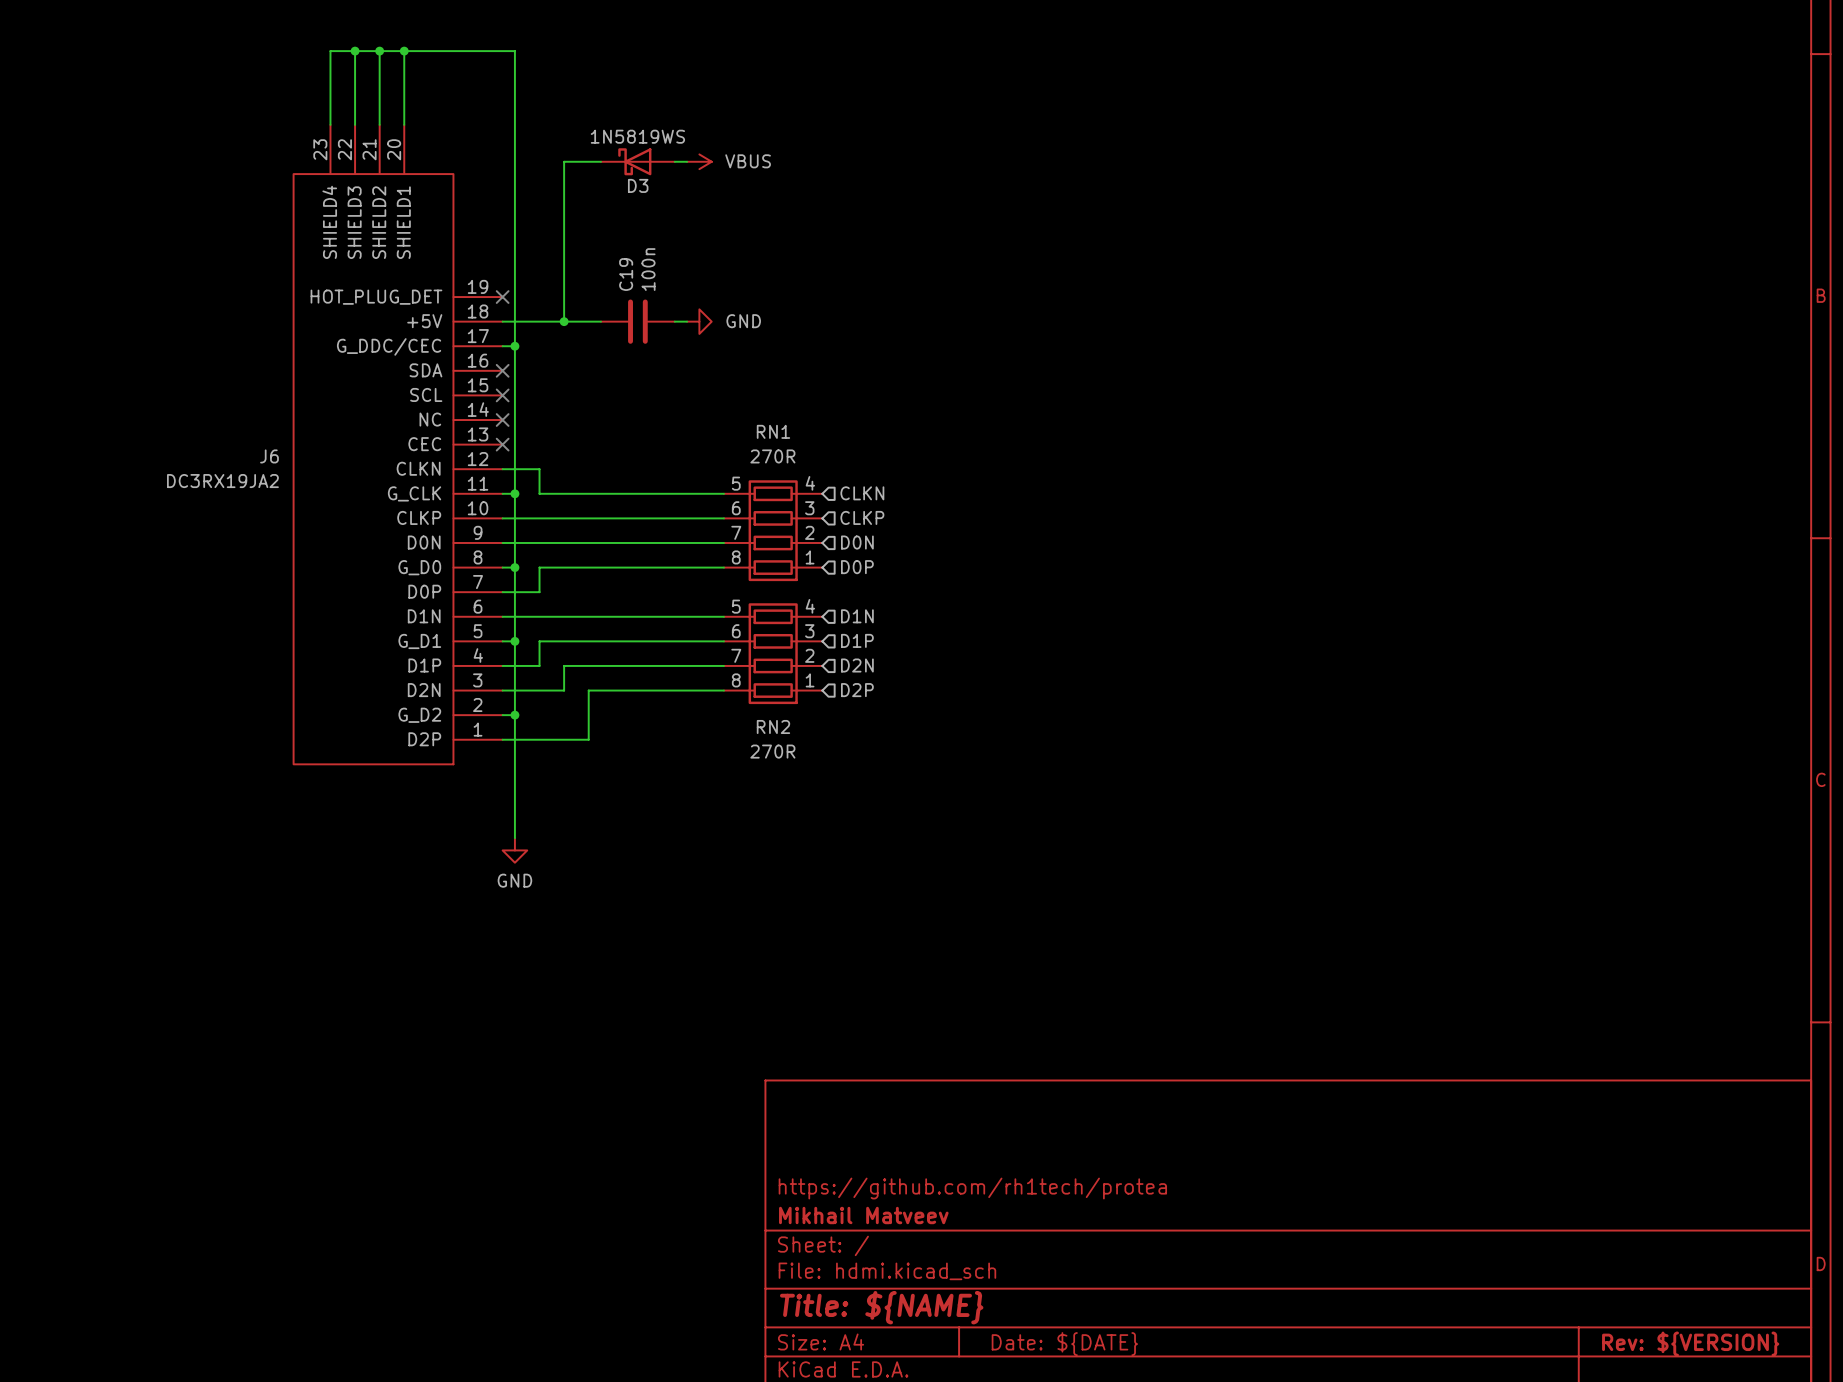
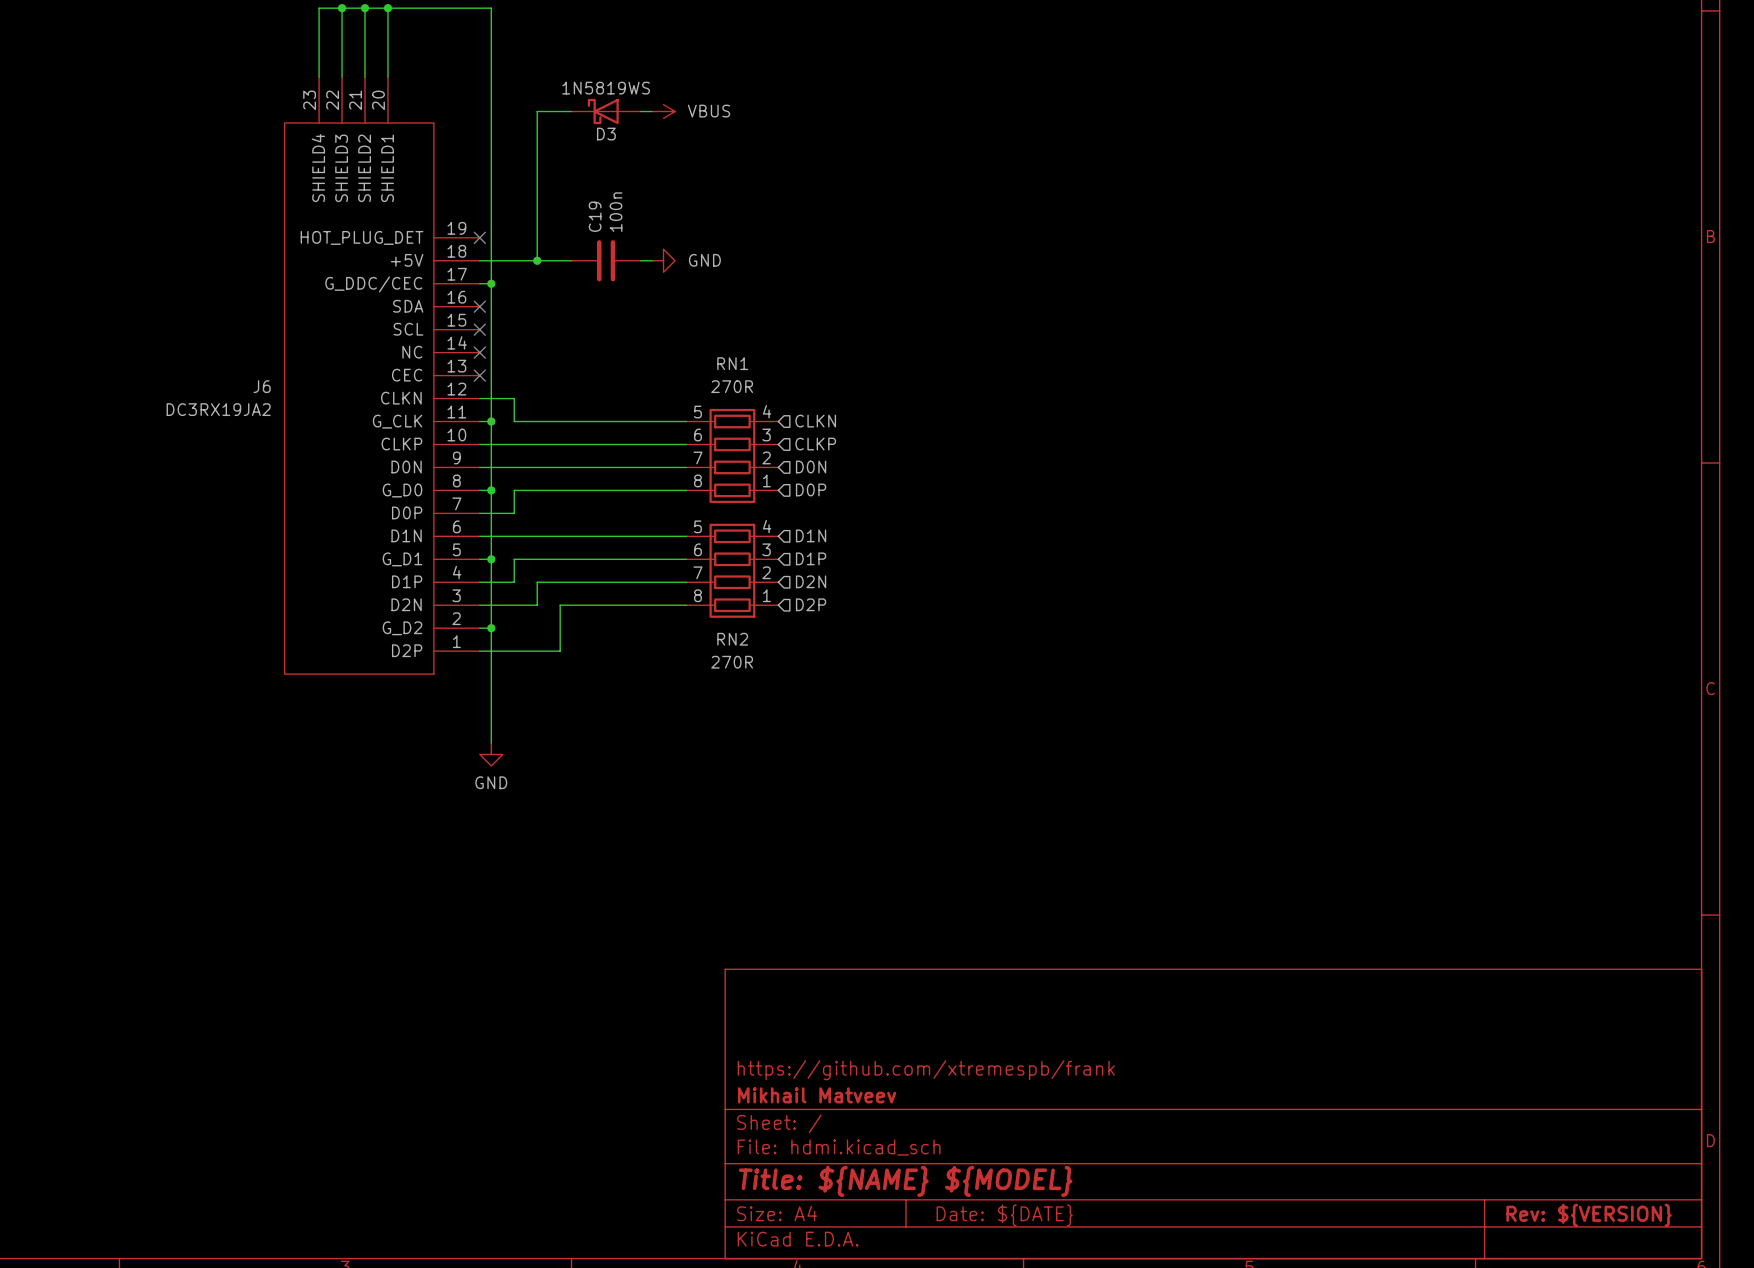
title block: https://github.com/rh1tech/protea (972, 1188) -> https://github.com/xtremespb/frank (926, 1070)
title block: Title: ${NAME} (881, 1307) -> Title: ${NAME} ${MODEL} (905, 1181)

